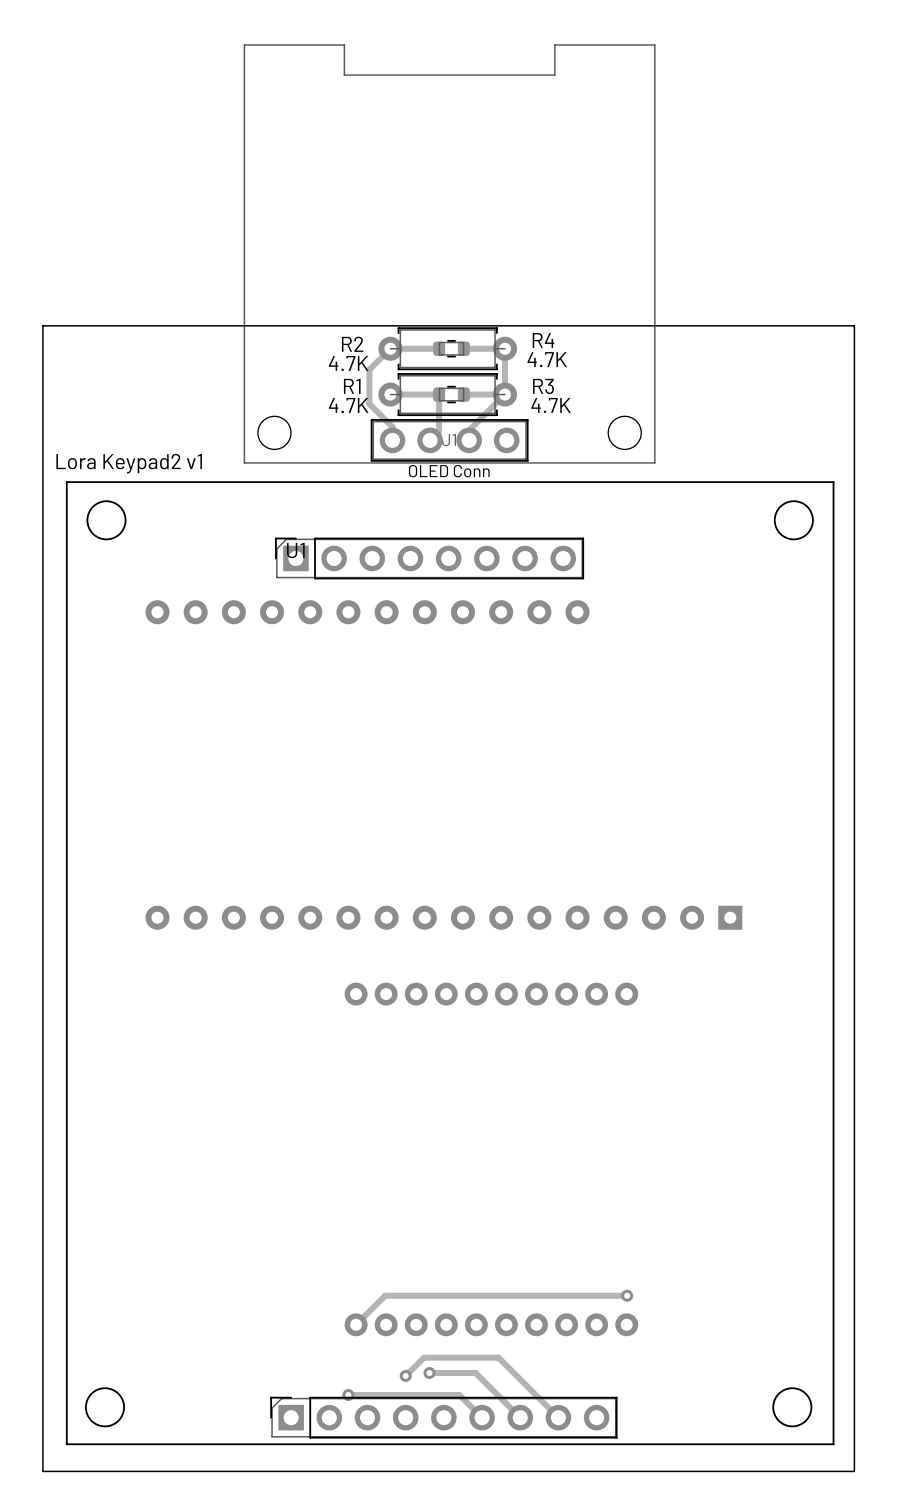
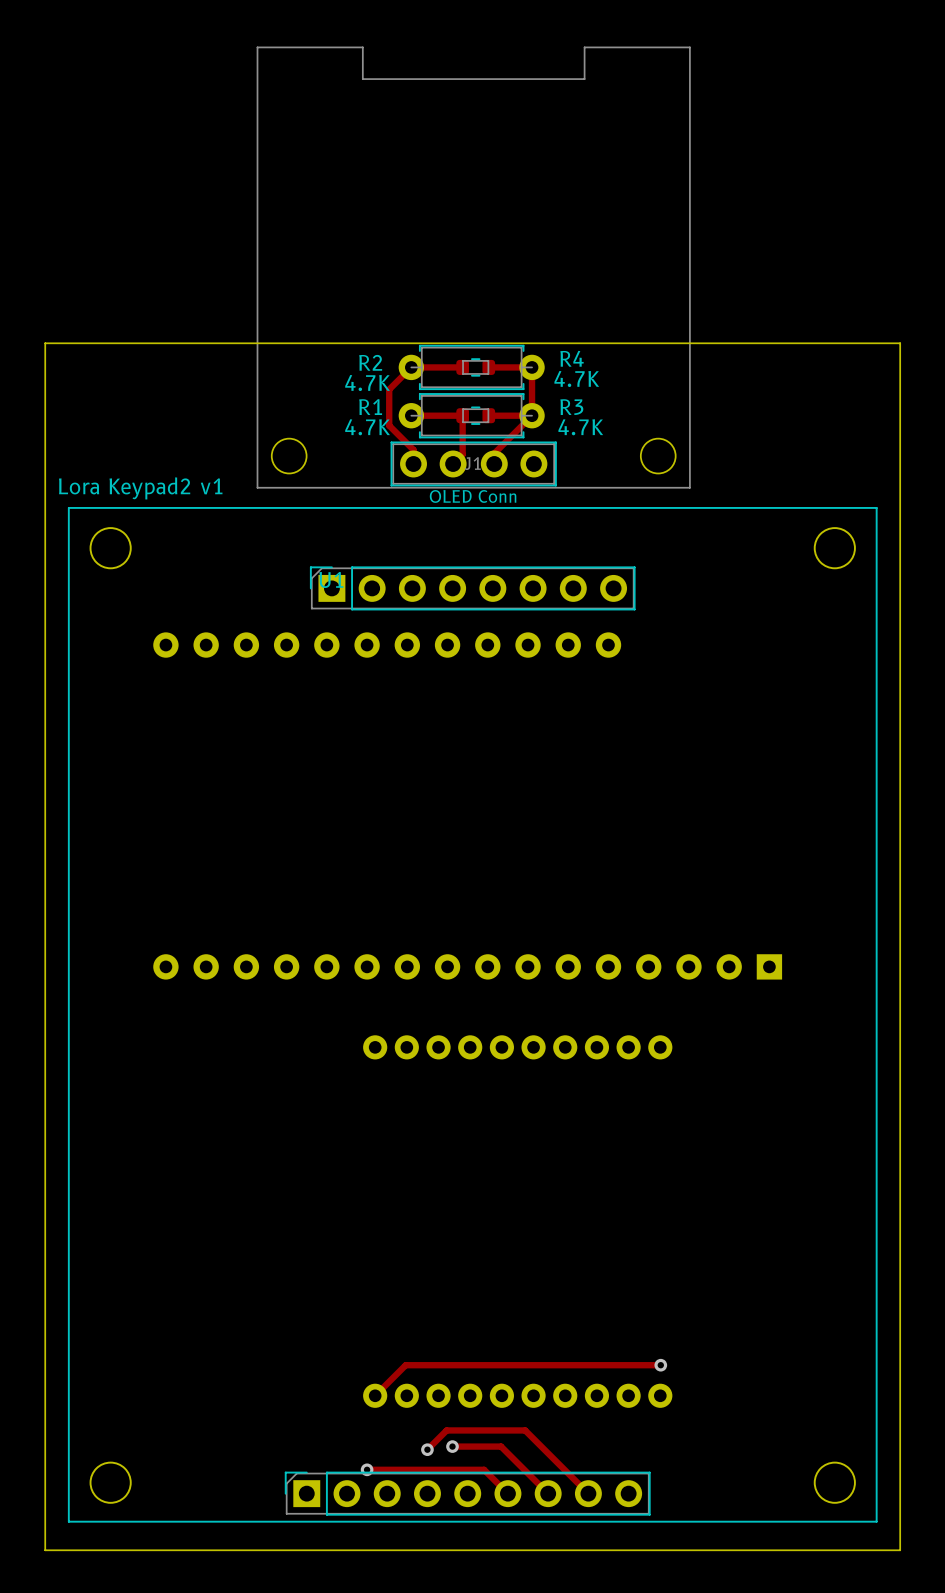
U1 footprint: [65, 481, 835, 1446] -> [67, 506, 878, 1523]

